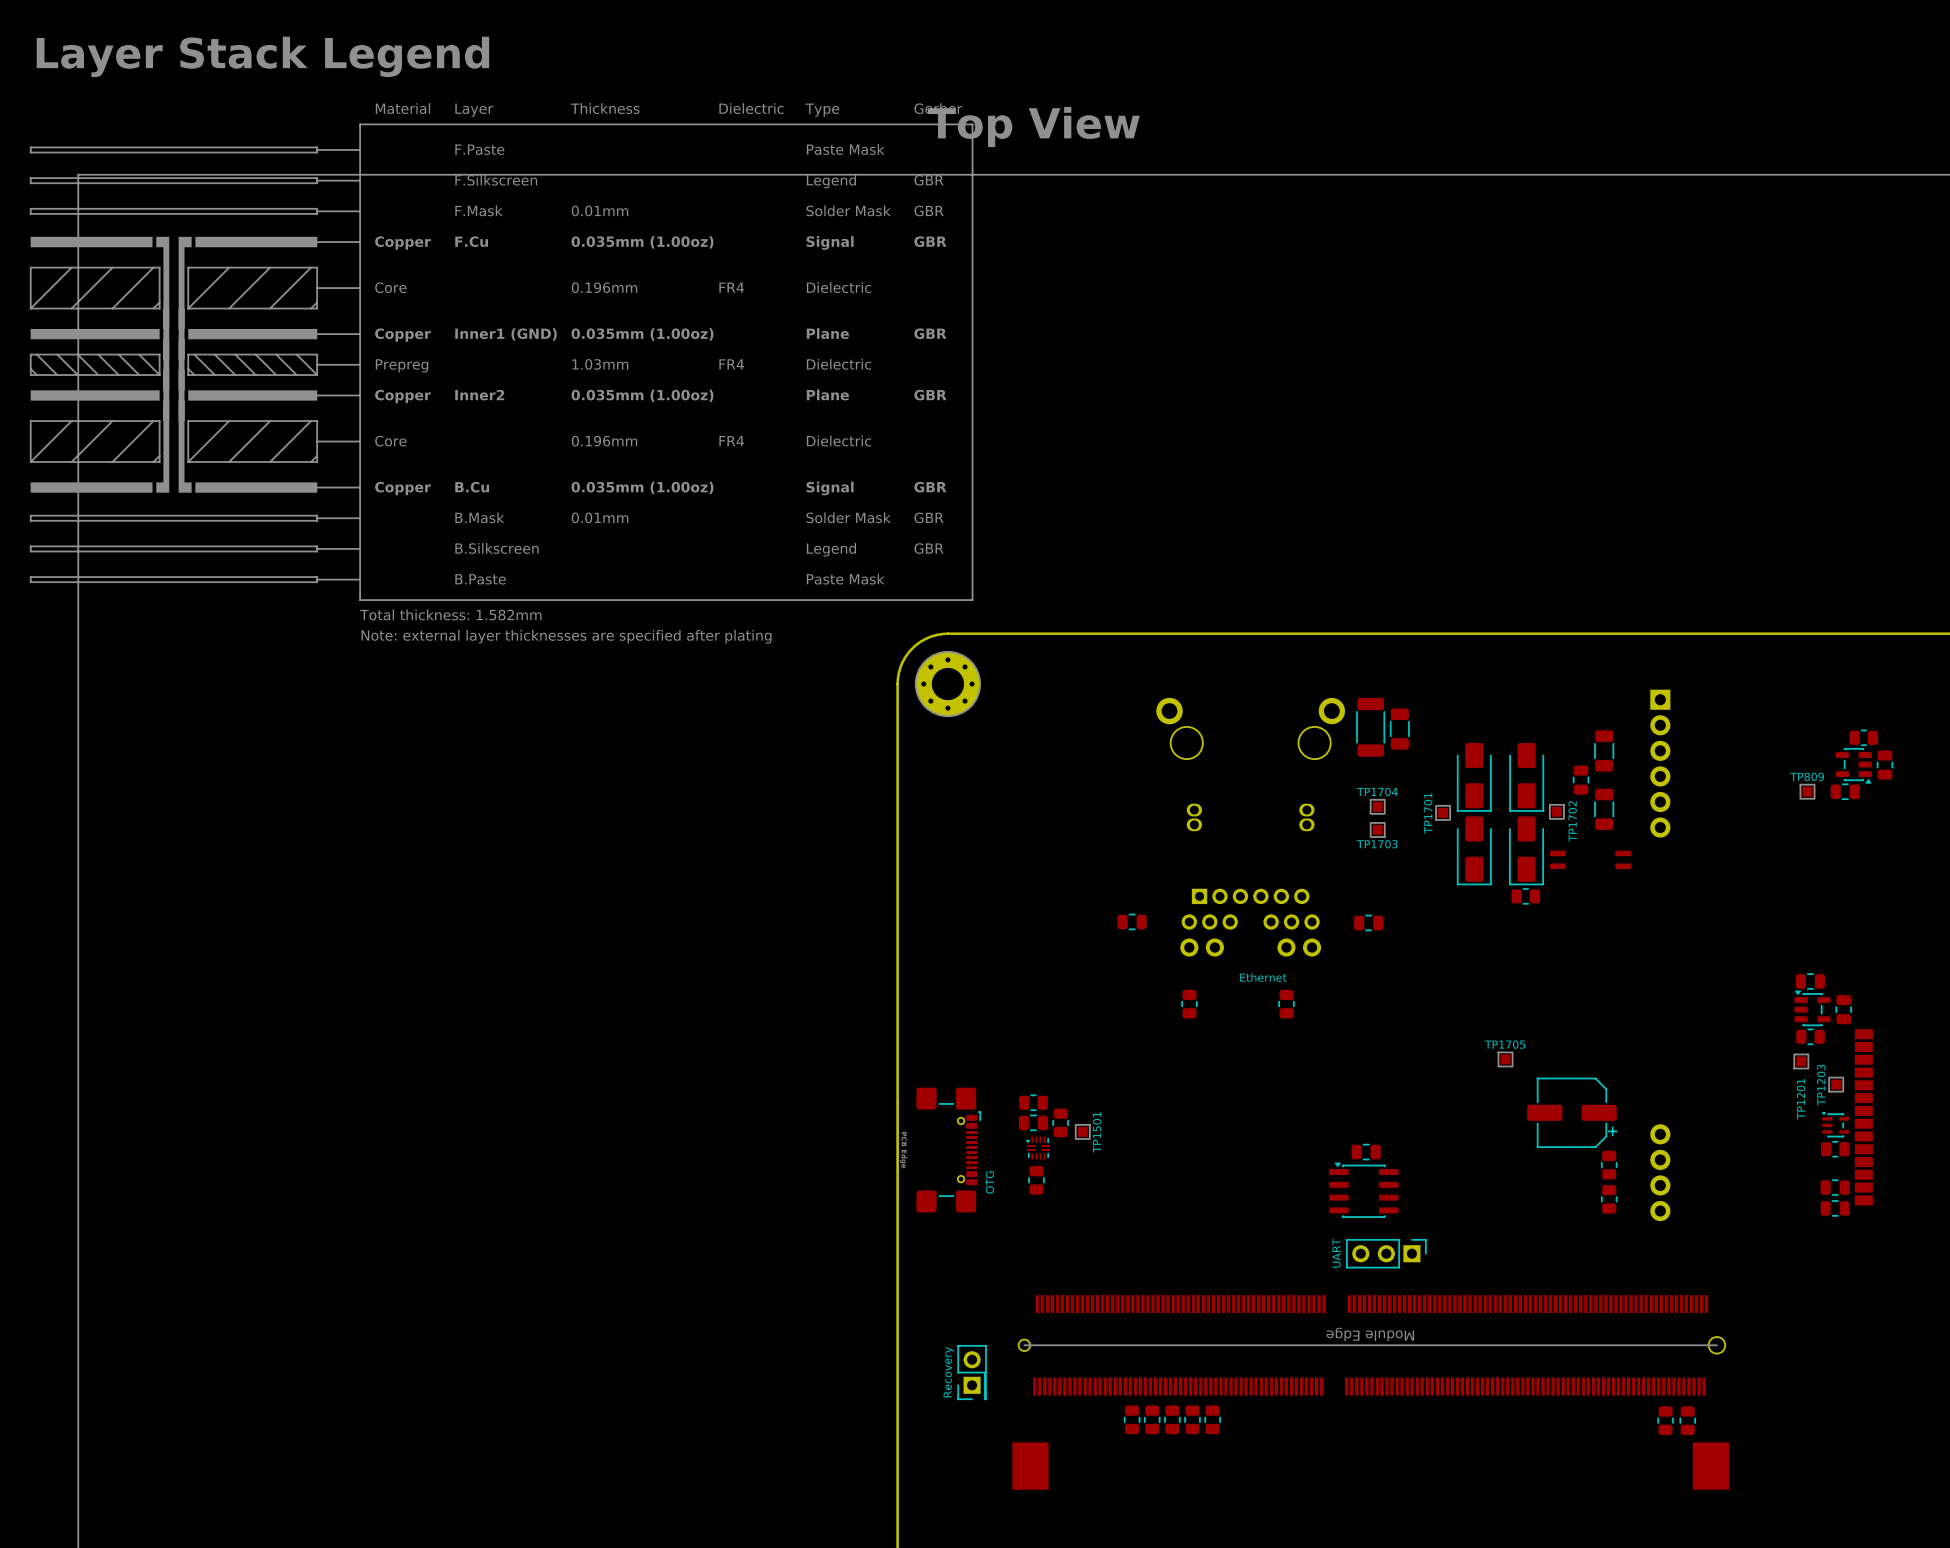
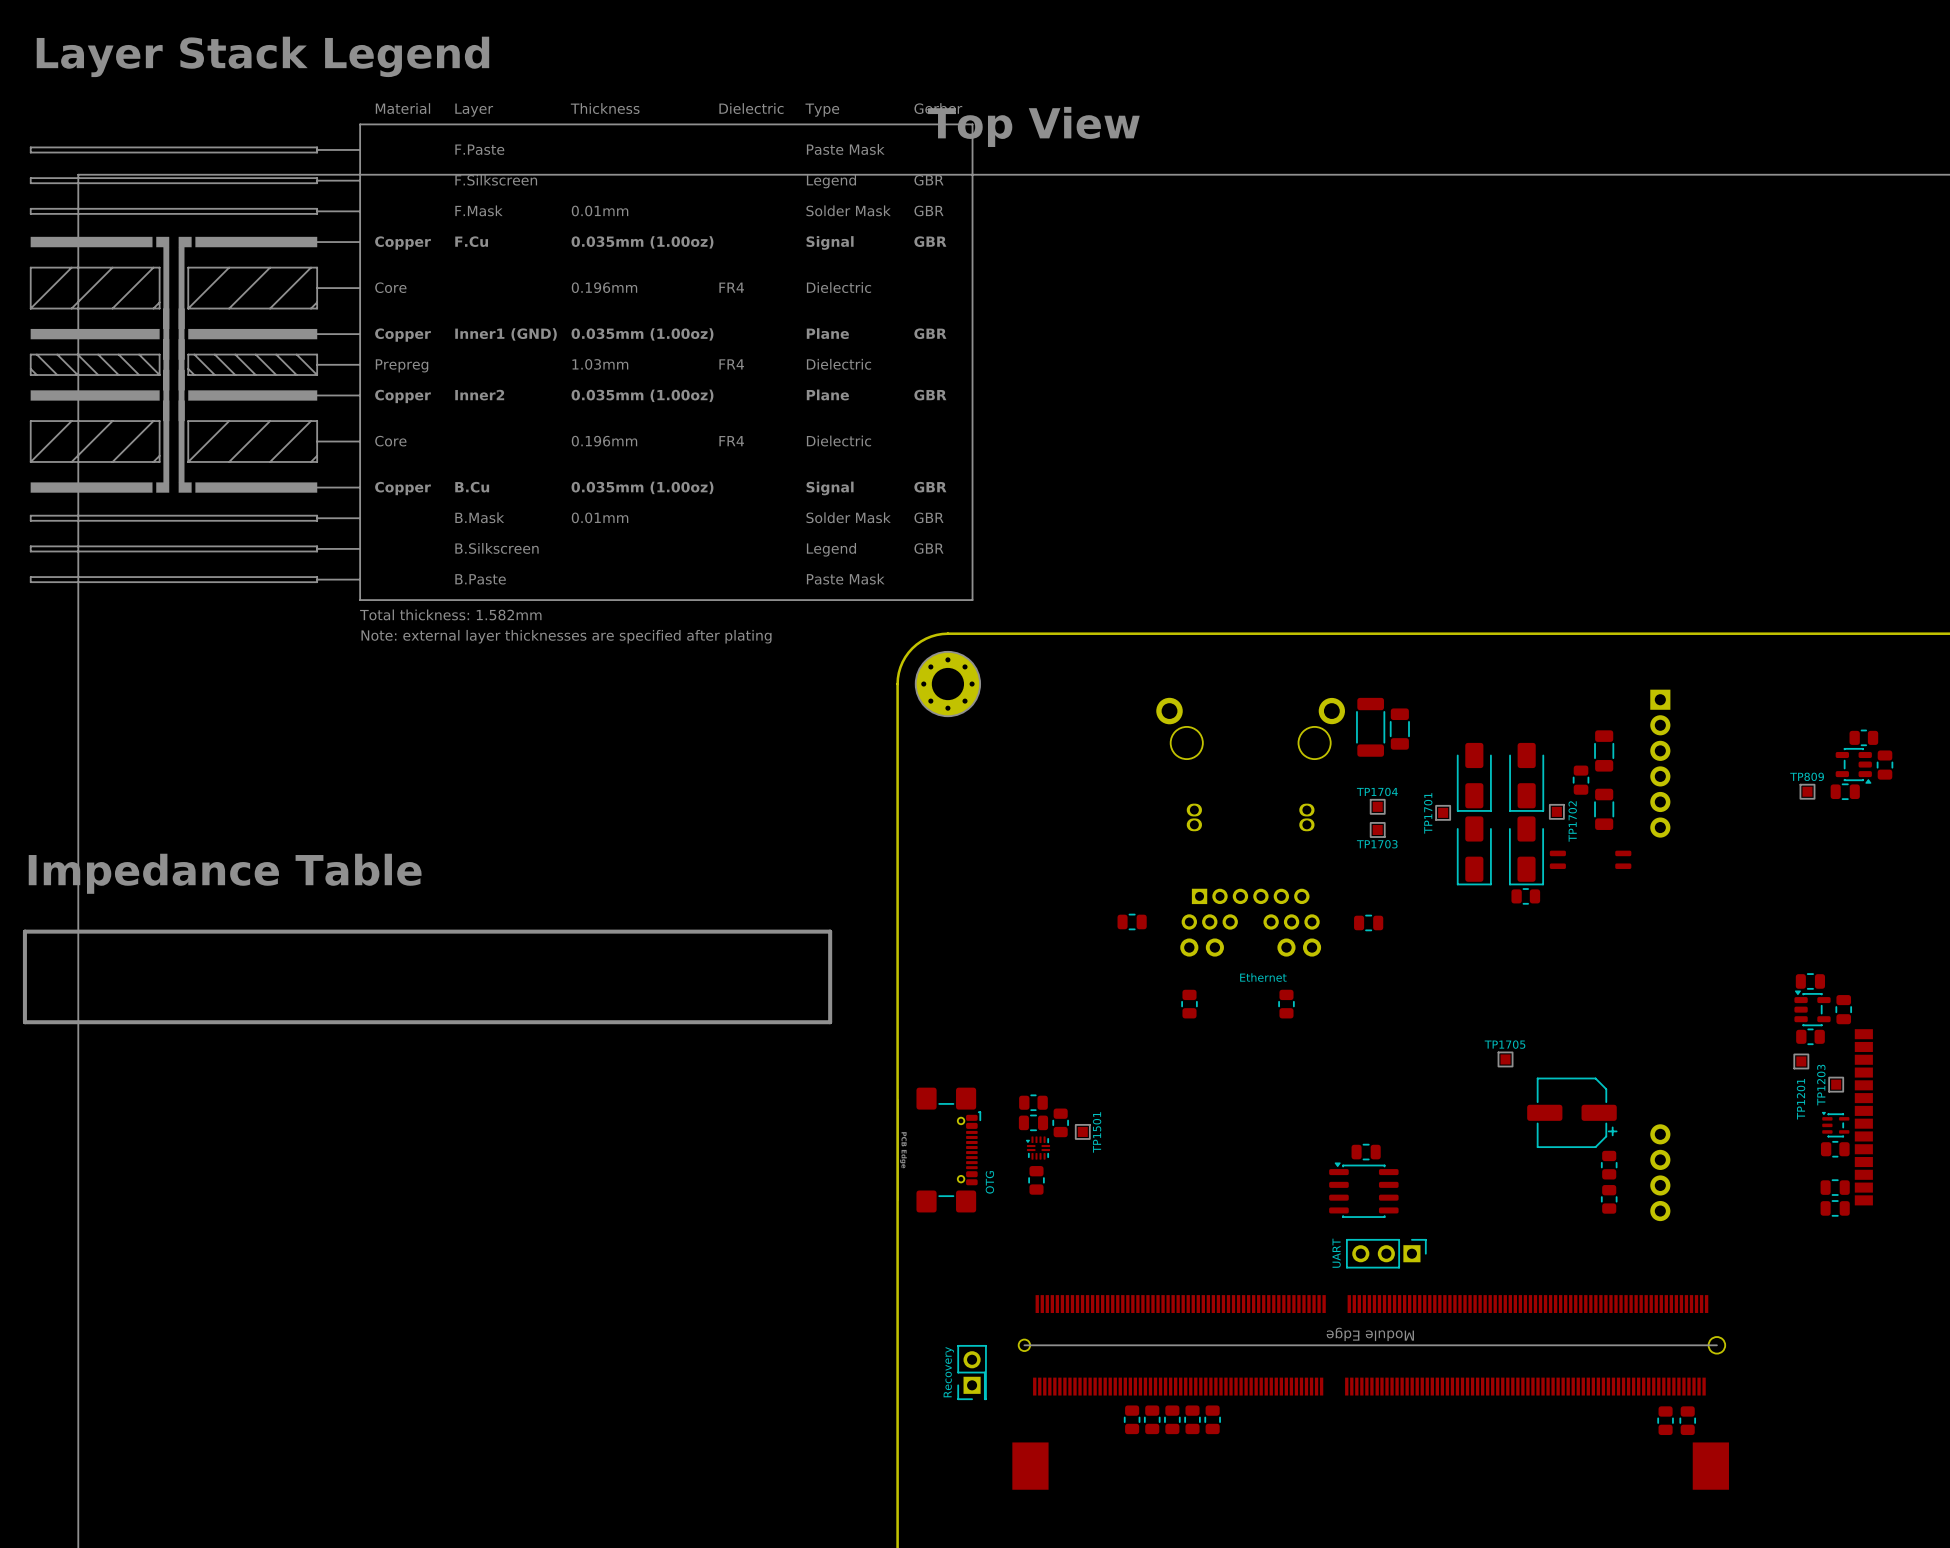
text: none -> Impedance Table (225, 873)
line: none -> (24, 931) (830, 931) (830, 1022) (24, 1022) (24, 931)

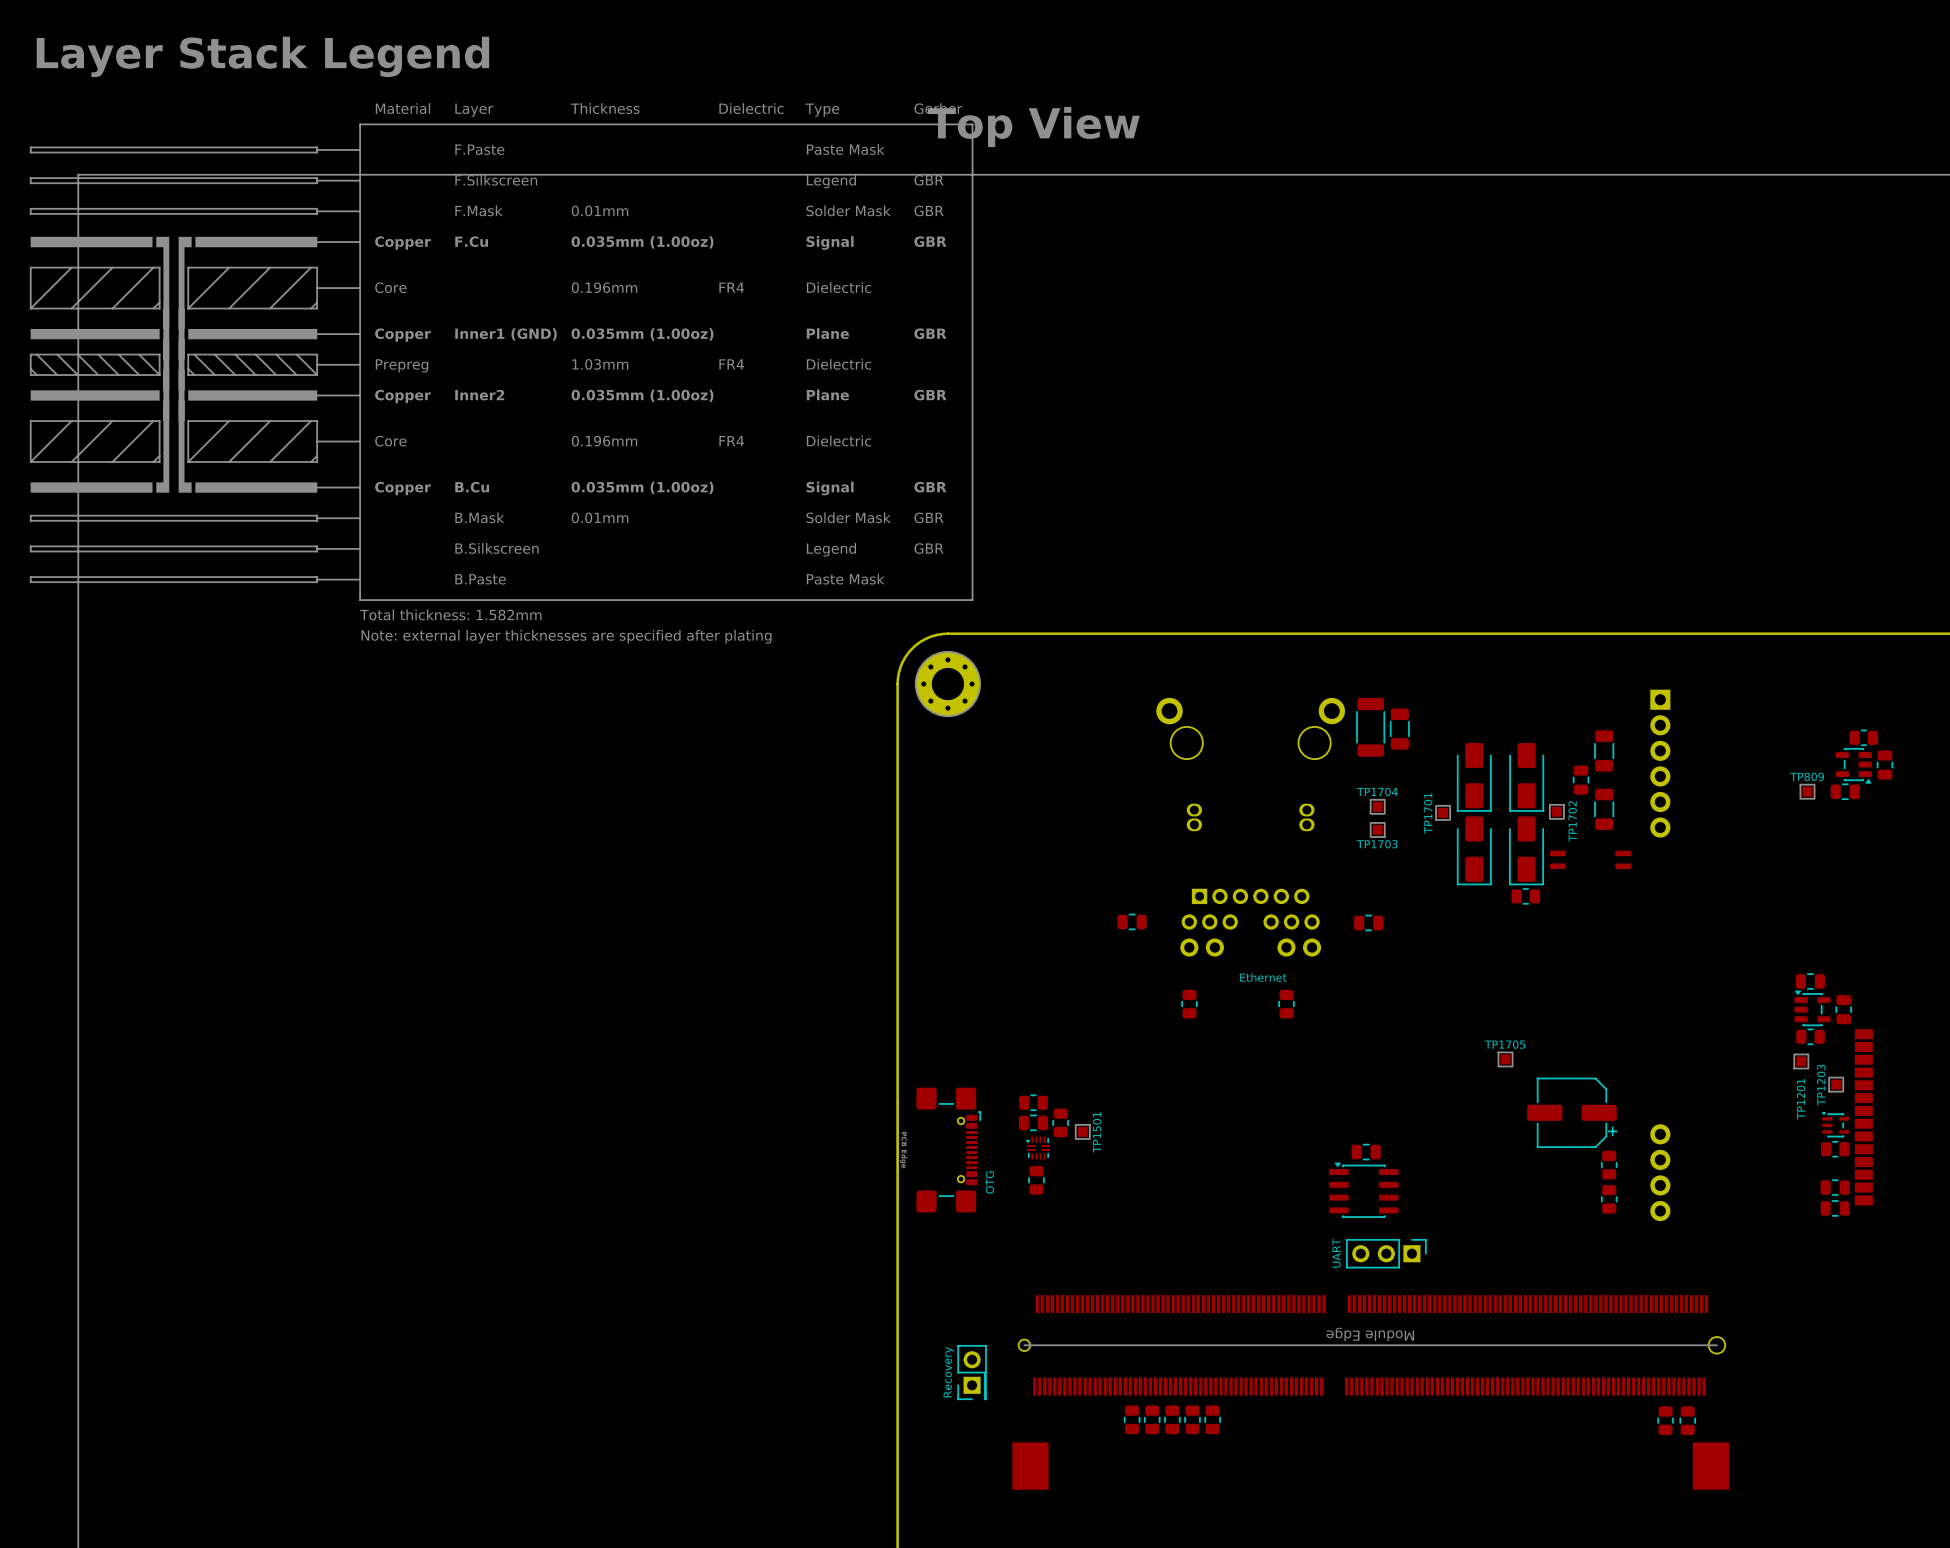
text: Impedance Table (225, 873) -> none
line: (24, 931) (830, 931) (830, 1022) (24, 1022) (24, 931) -> none

